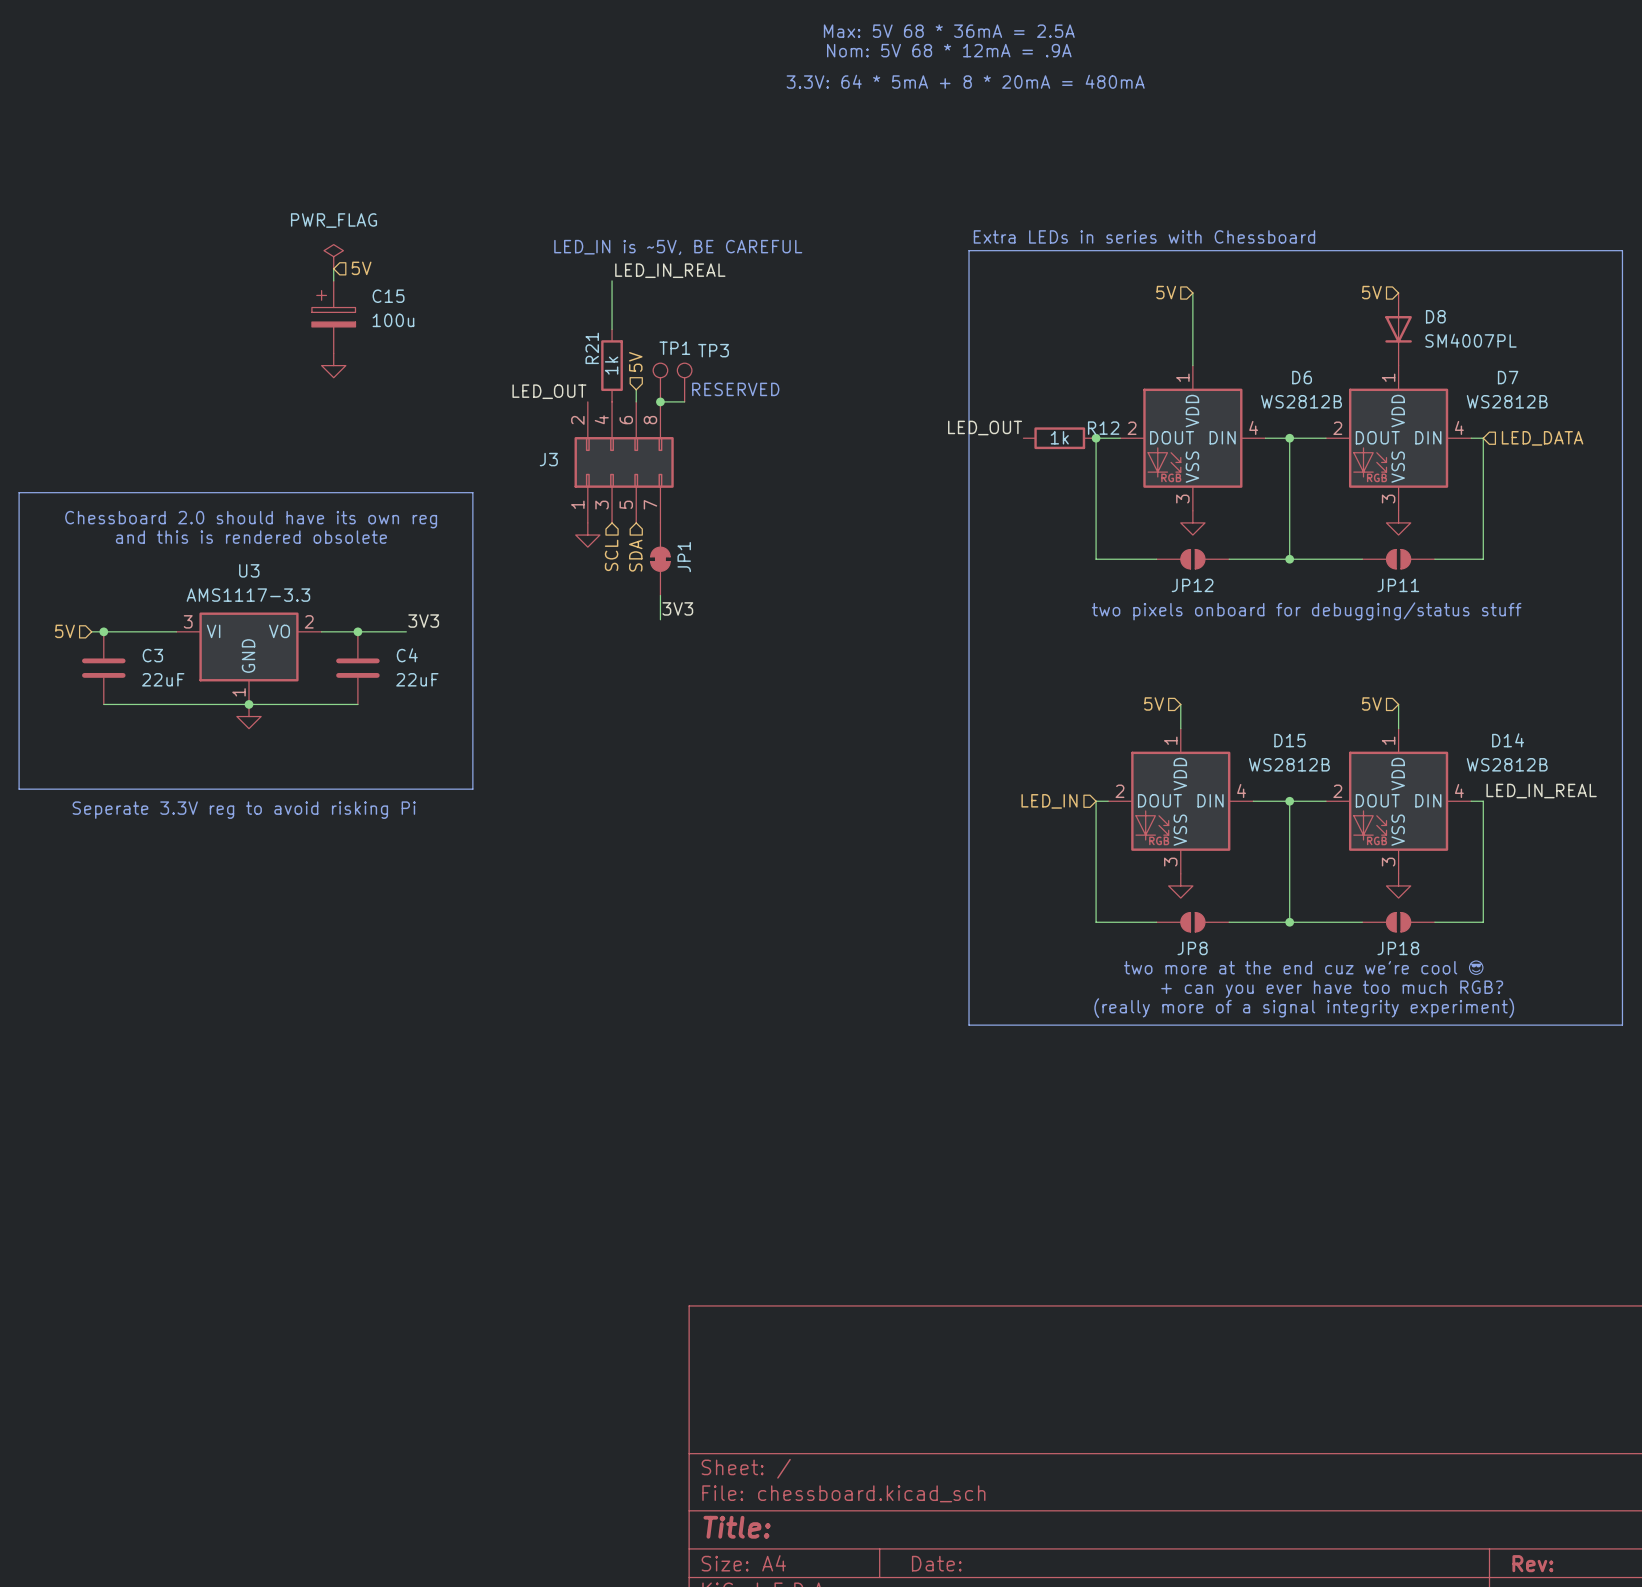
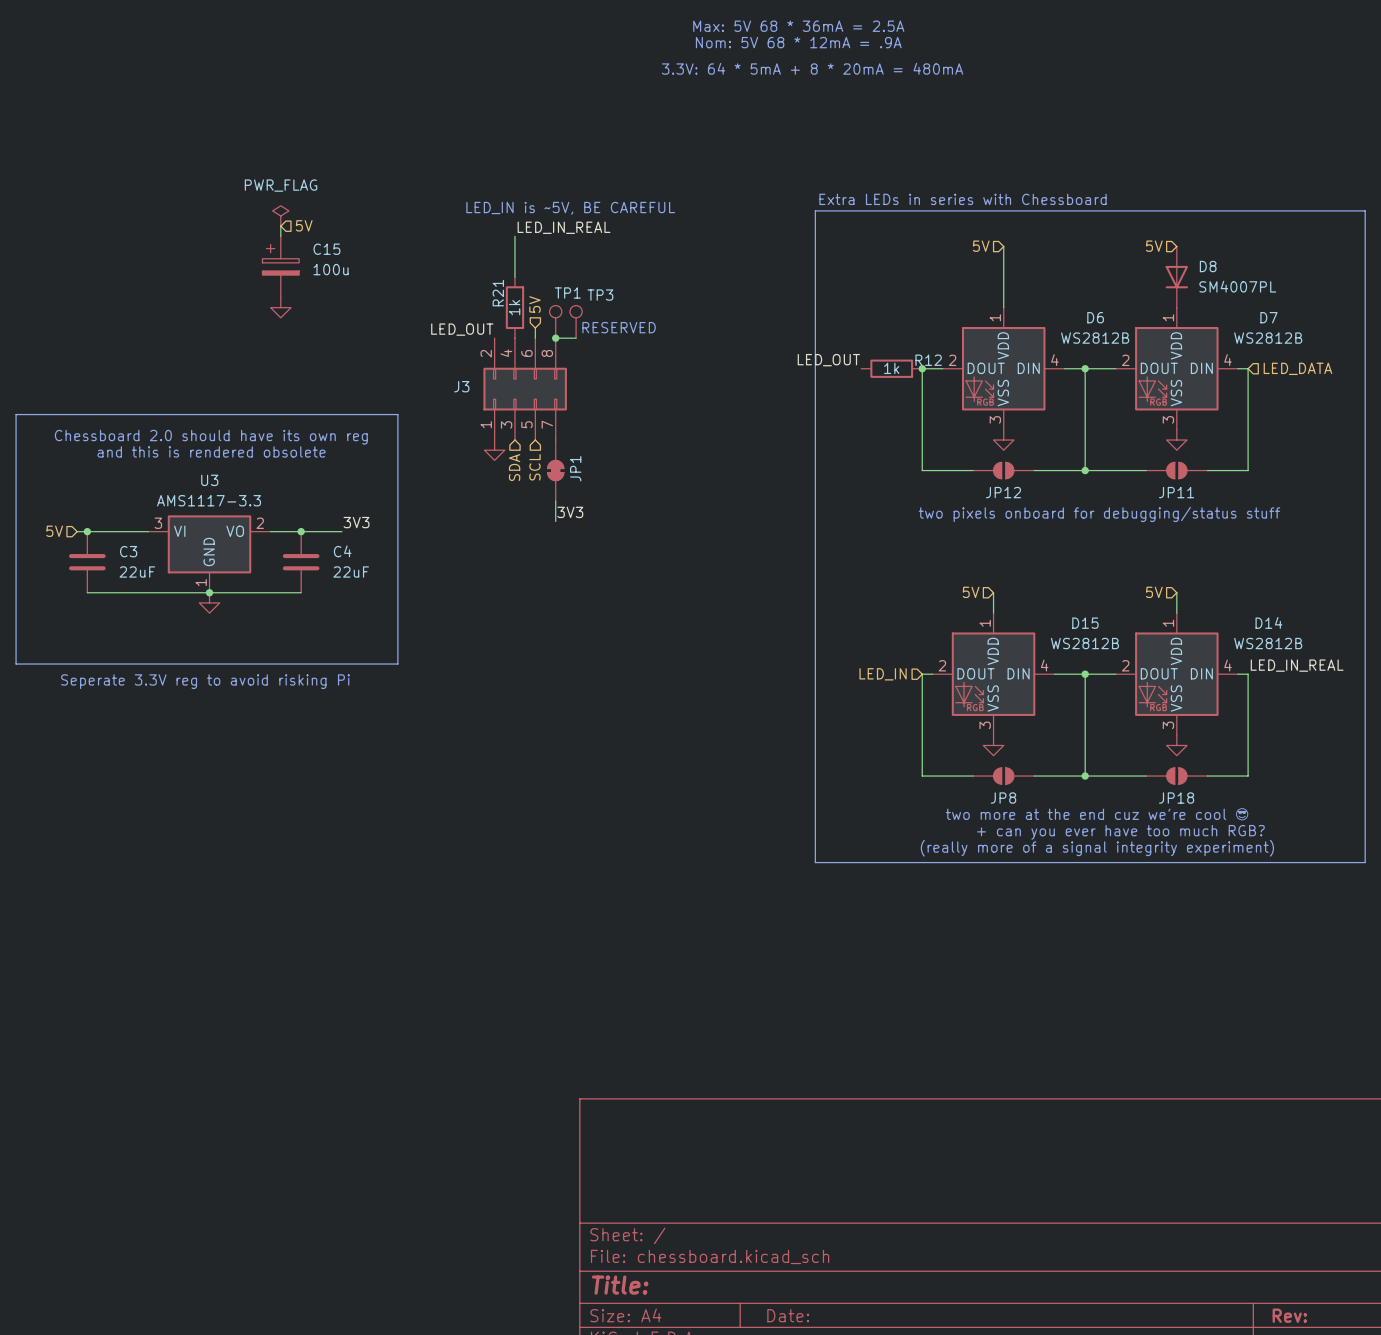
hierarchical label: SCL (611, 555) -> SDA (514, 467)
hierarchical label: SDA (635, 555) -> SCL (534, 467)

